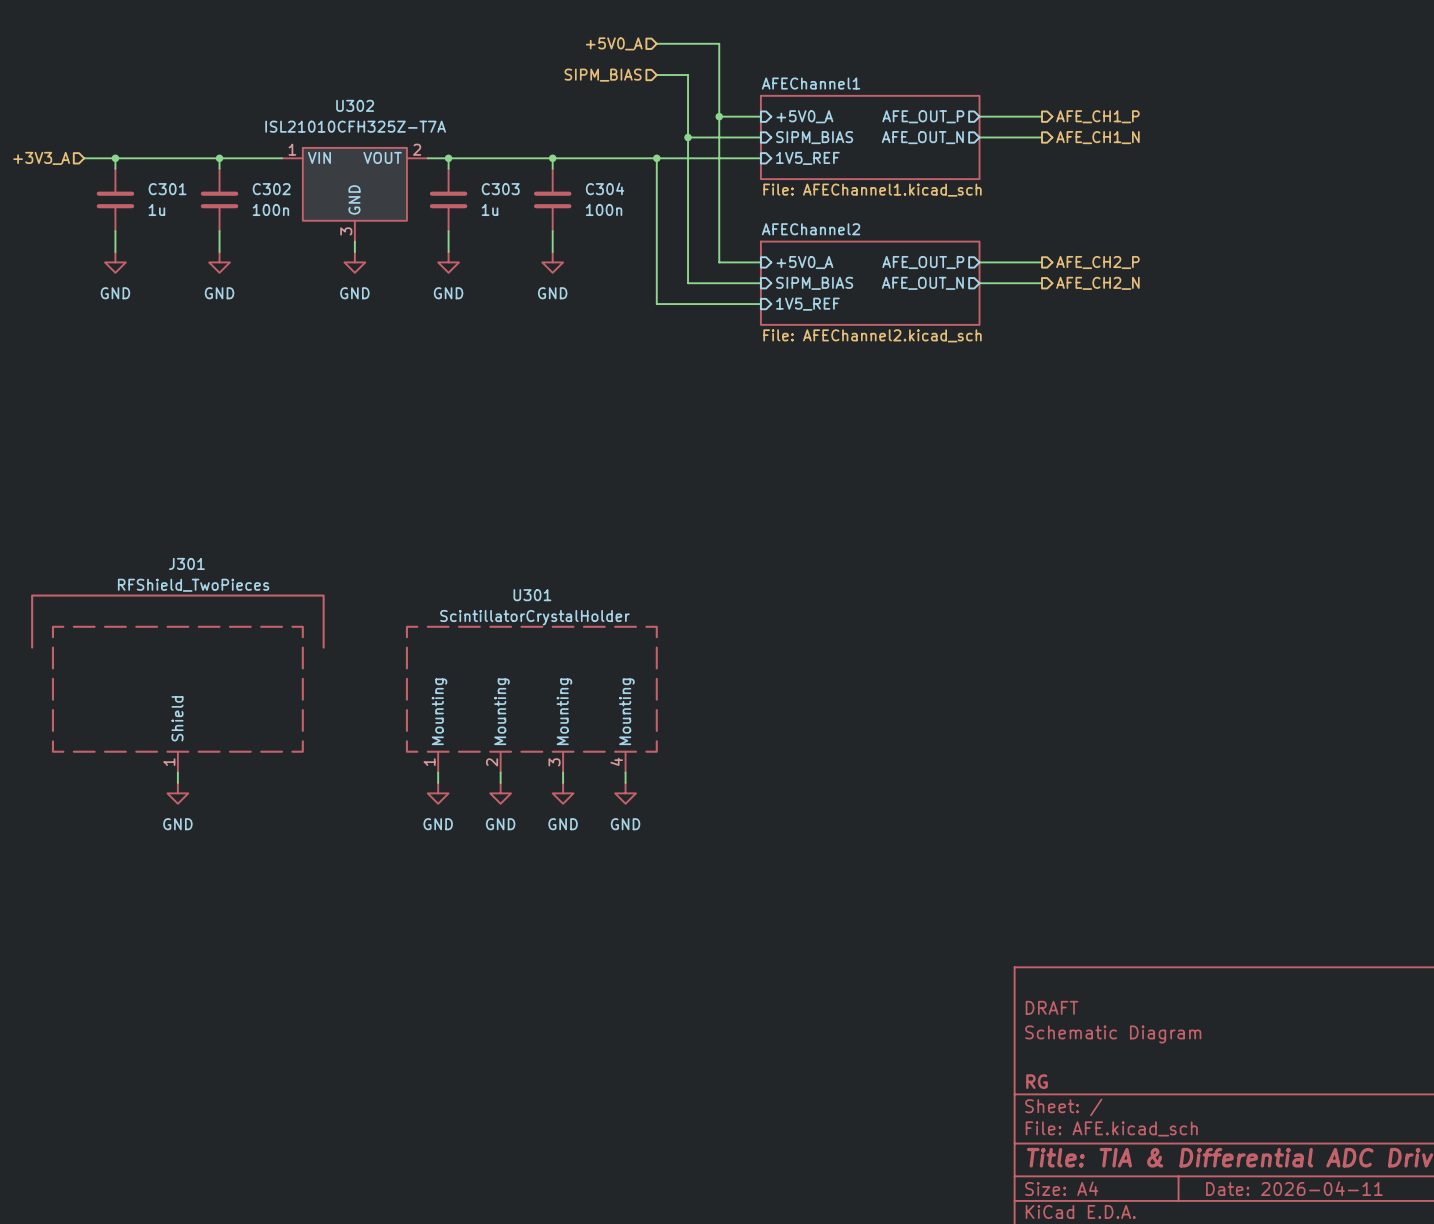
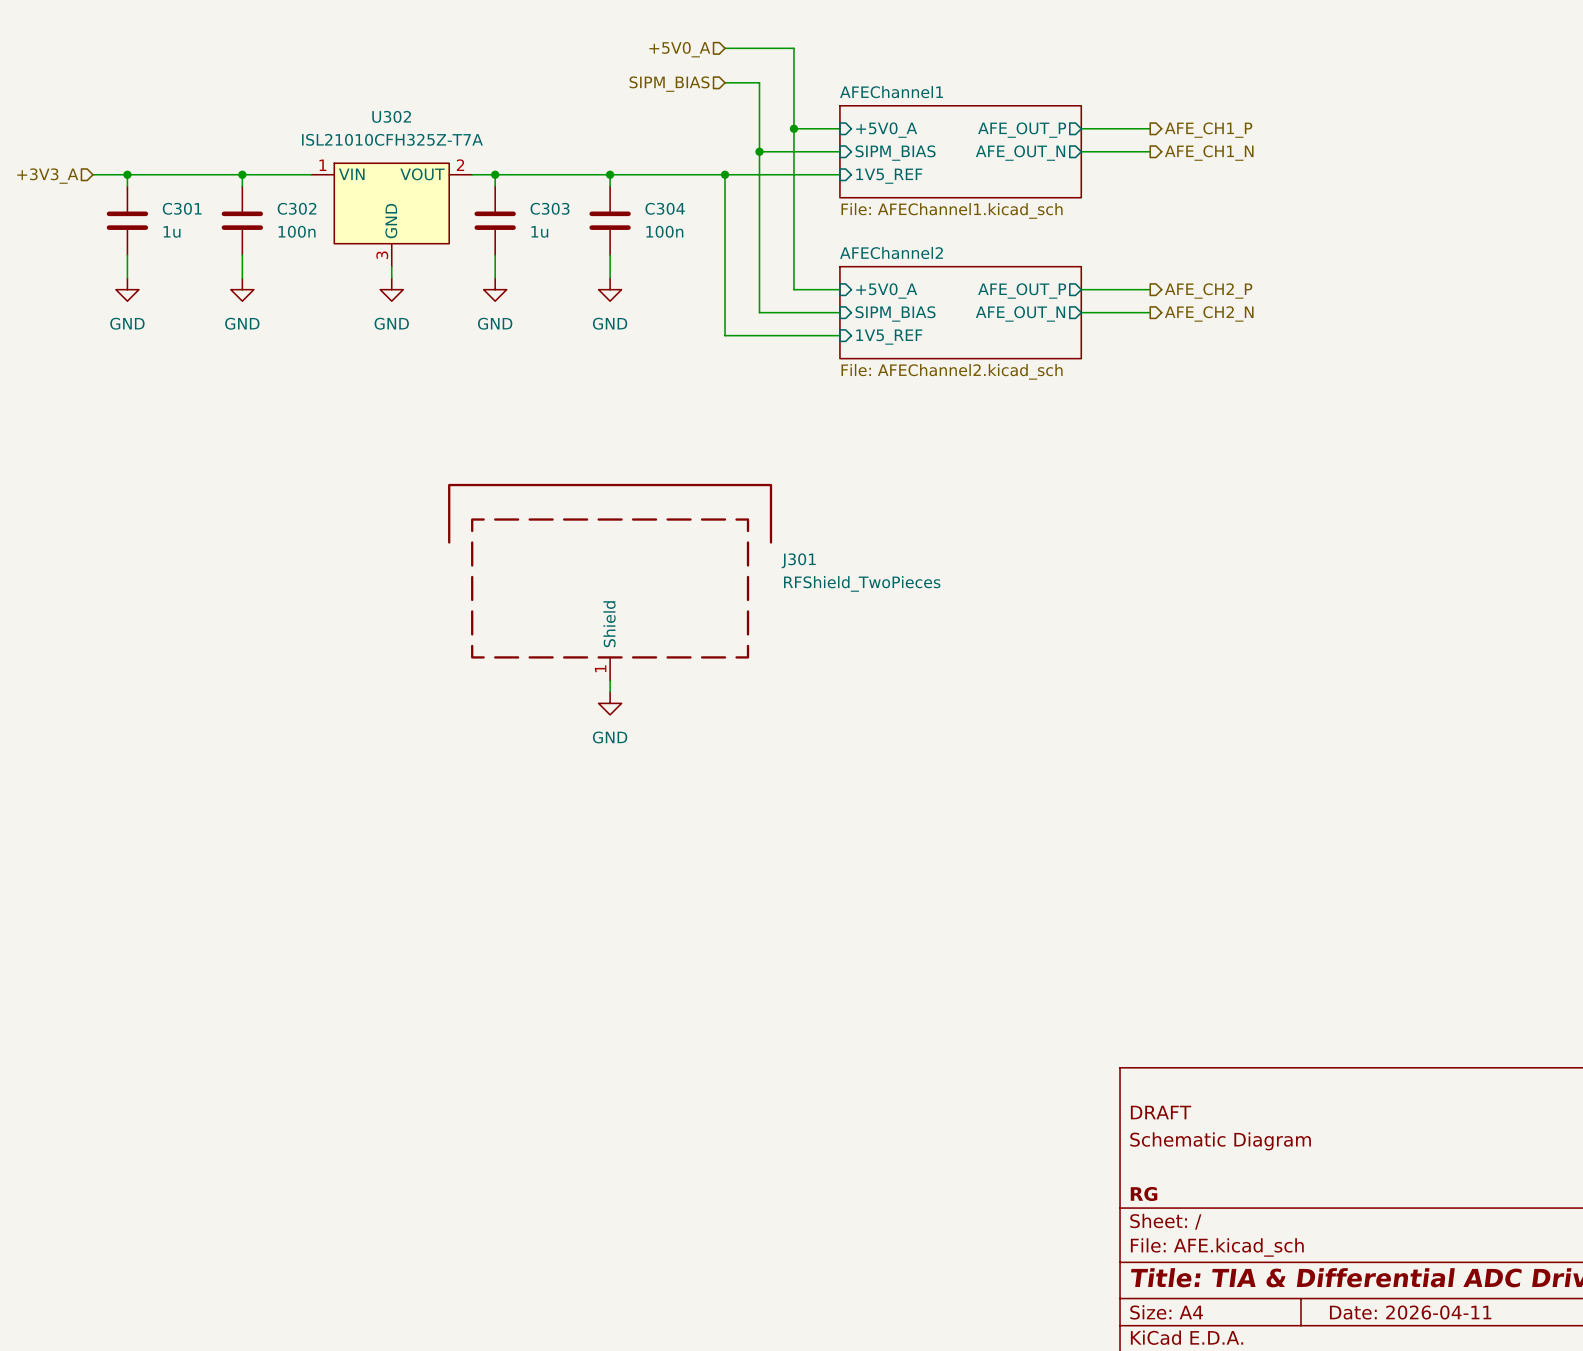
J301 name position: J301 (186, 563) -> J301 (798, 560)
J301 value position: RFShield_TwoPieces (193, 585) -> RFShield_TwoPieces (862, 583)
power symbol: none -> GND (610, 703)
J301 position: (177, 683) -> (610, 582)
U301: ScintillatorCrystalHolder (531, 699) -> none
wire: (177, 772) (177, 782) -> none
wire: (438, 772) (438, 782) -> none
wire: (500, 772) (500, 782) -> none
wire: (563, 772) (563, 782) -> (610, 680) (610, 691)
wire: (625, 772) (625, 782) -> none
power symbol: GND (177, 793) -> none
power symbol: GND (438, 793) -> none
power symbol: GND (500, 793) -> none
power symbol: GND (563, 793) -> none
power symbol: GND (625, 793) -> none

